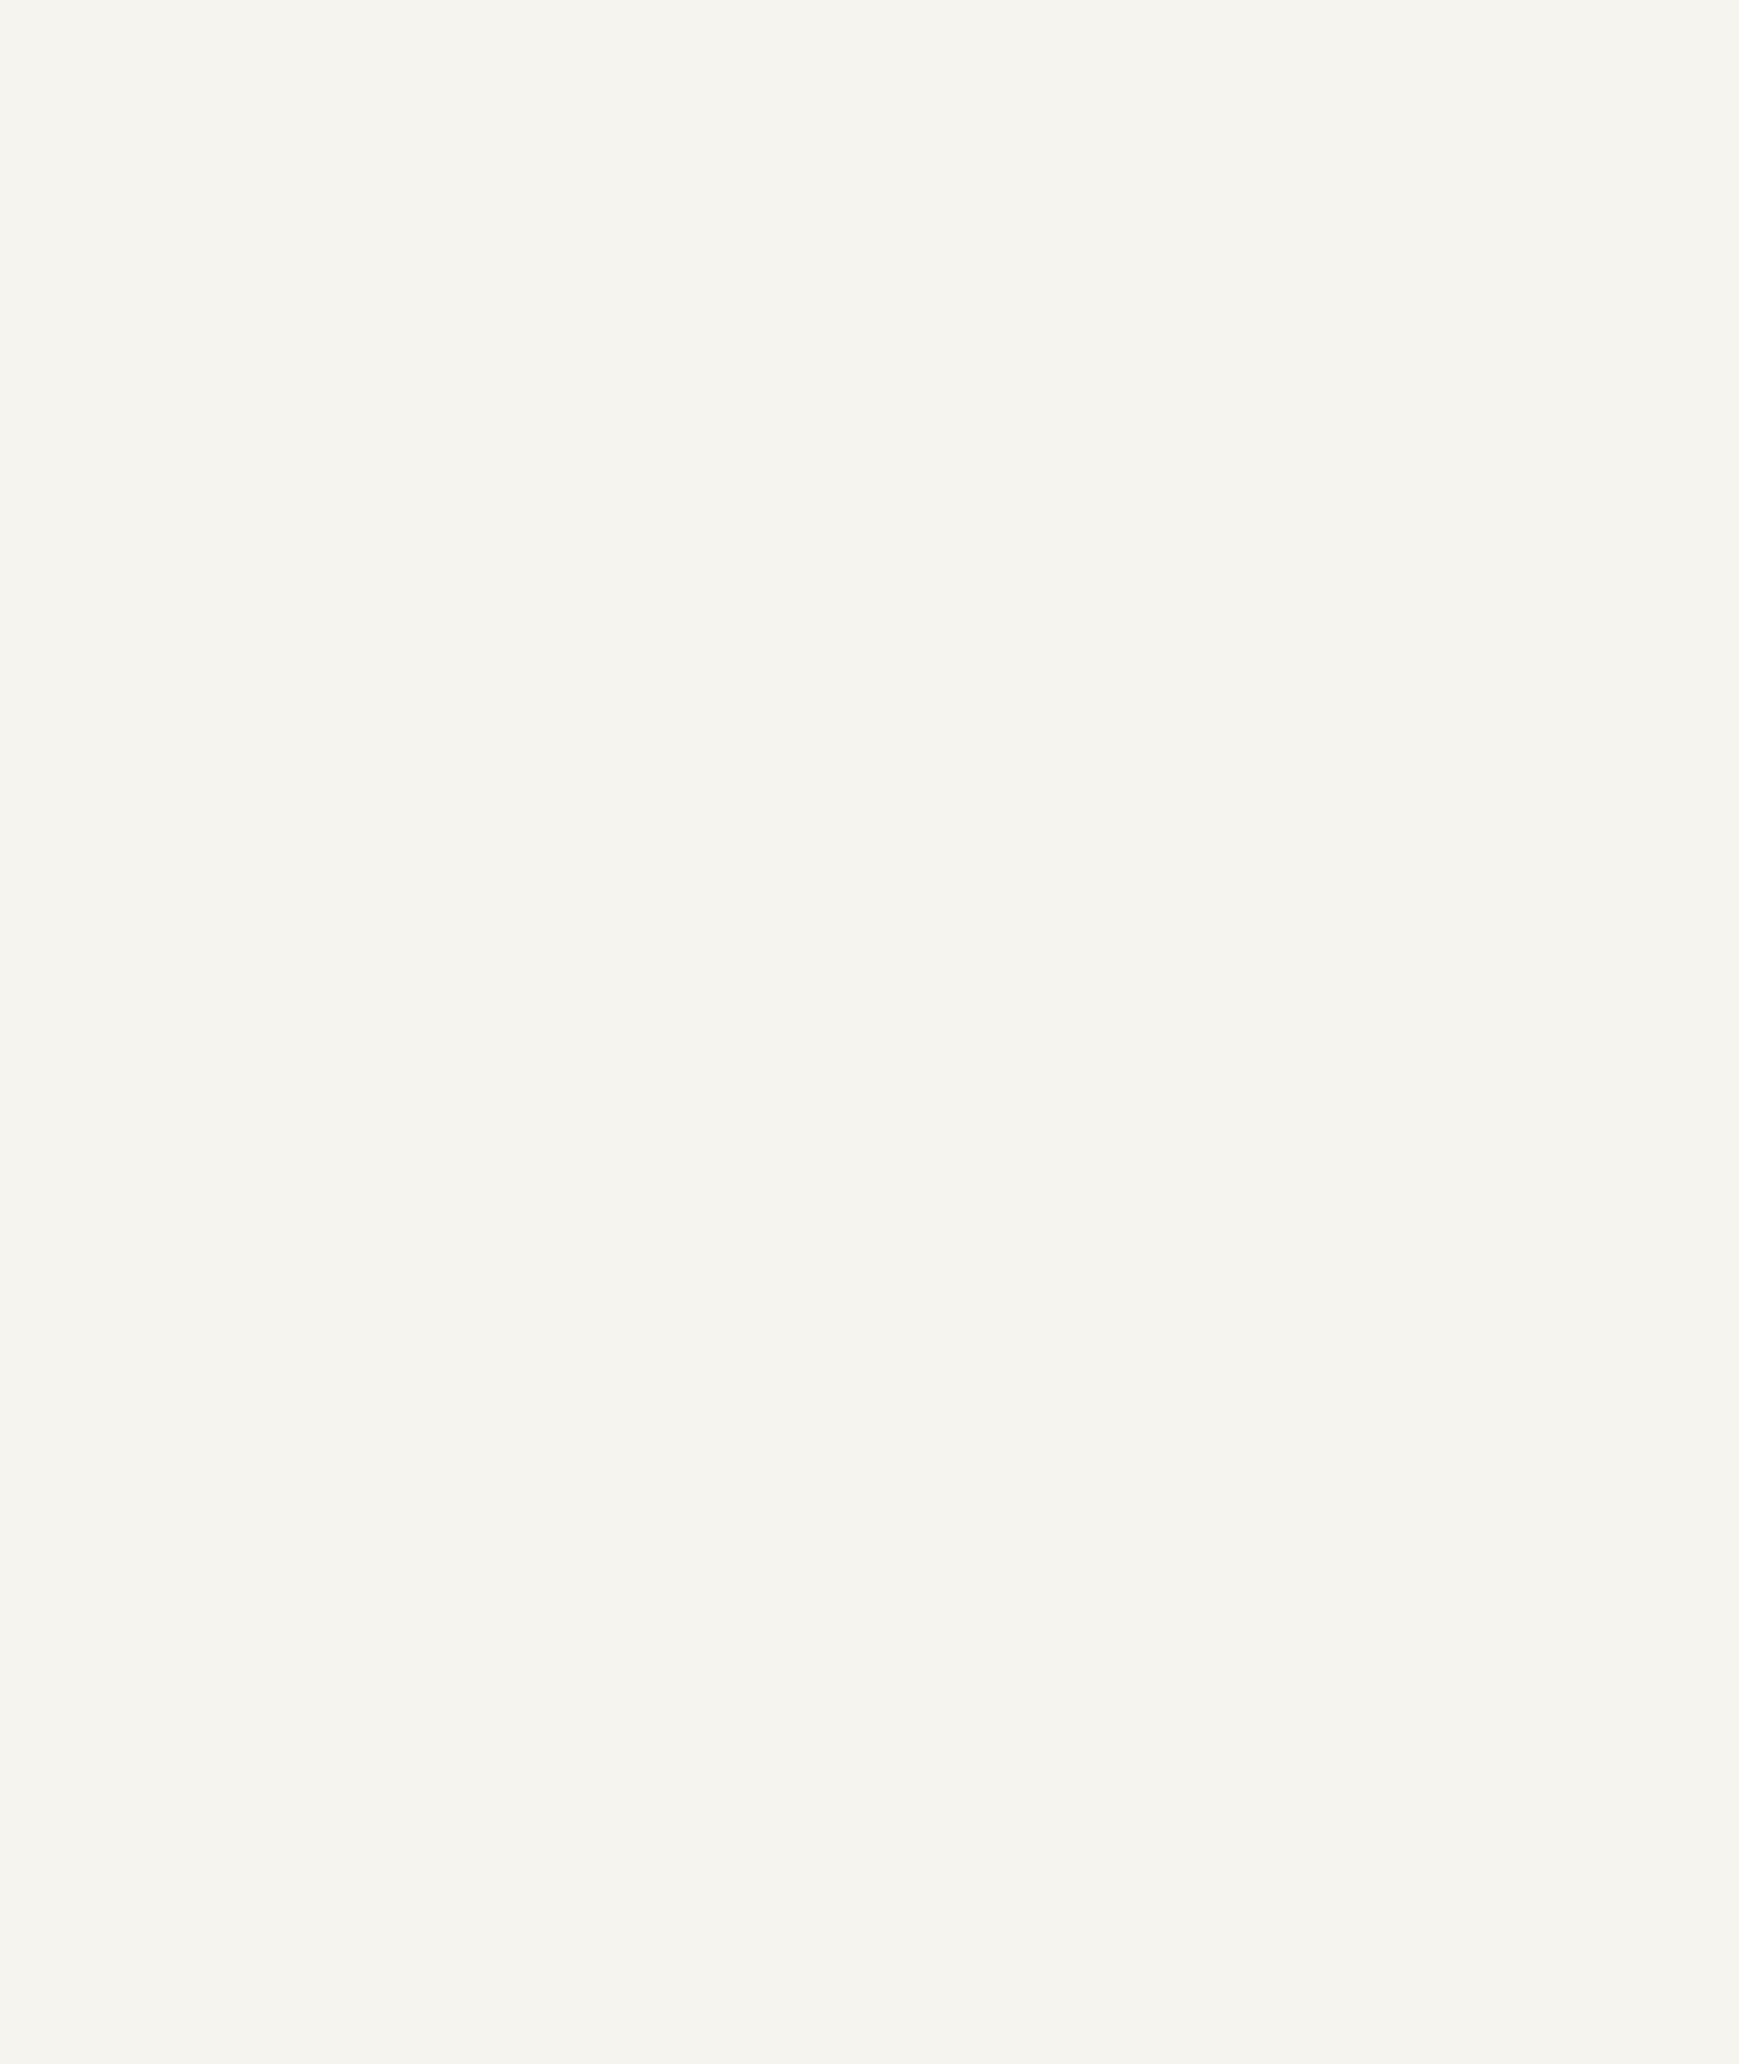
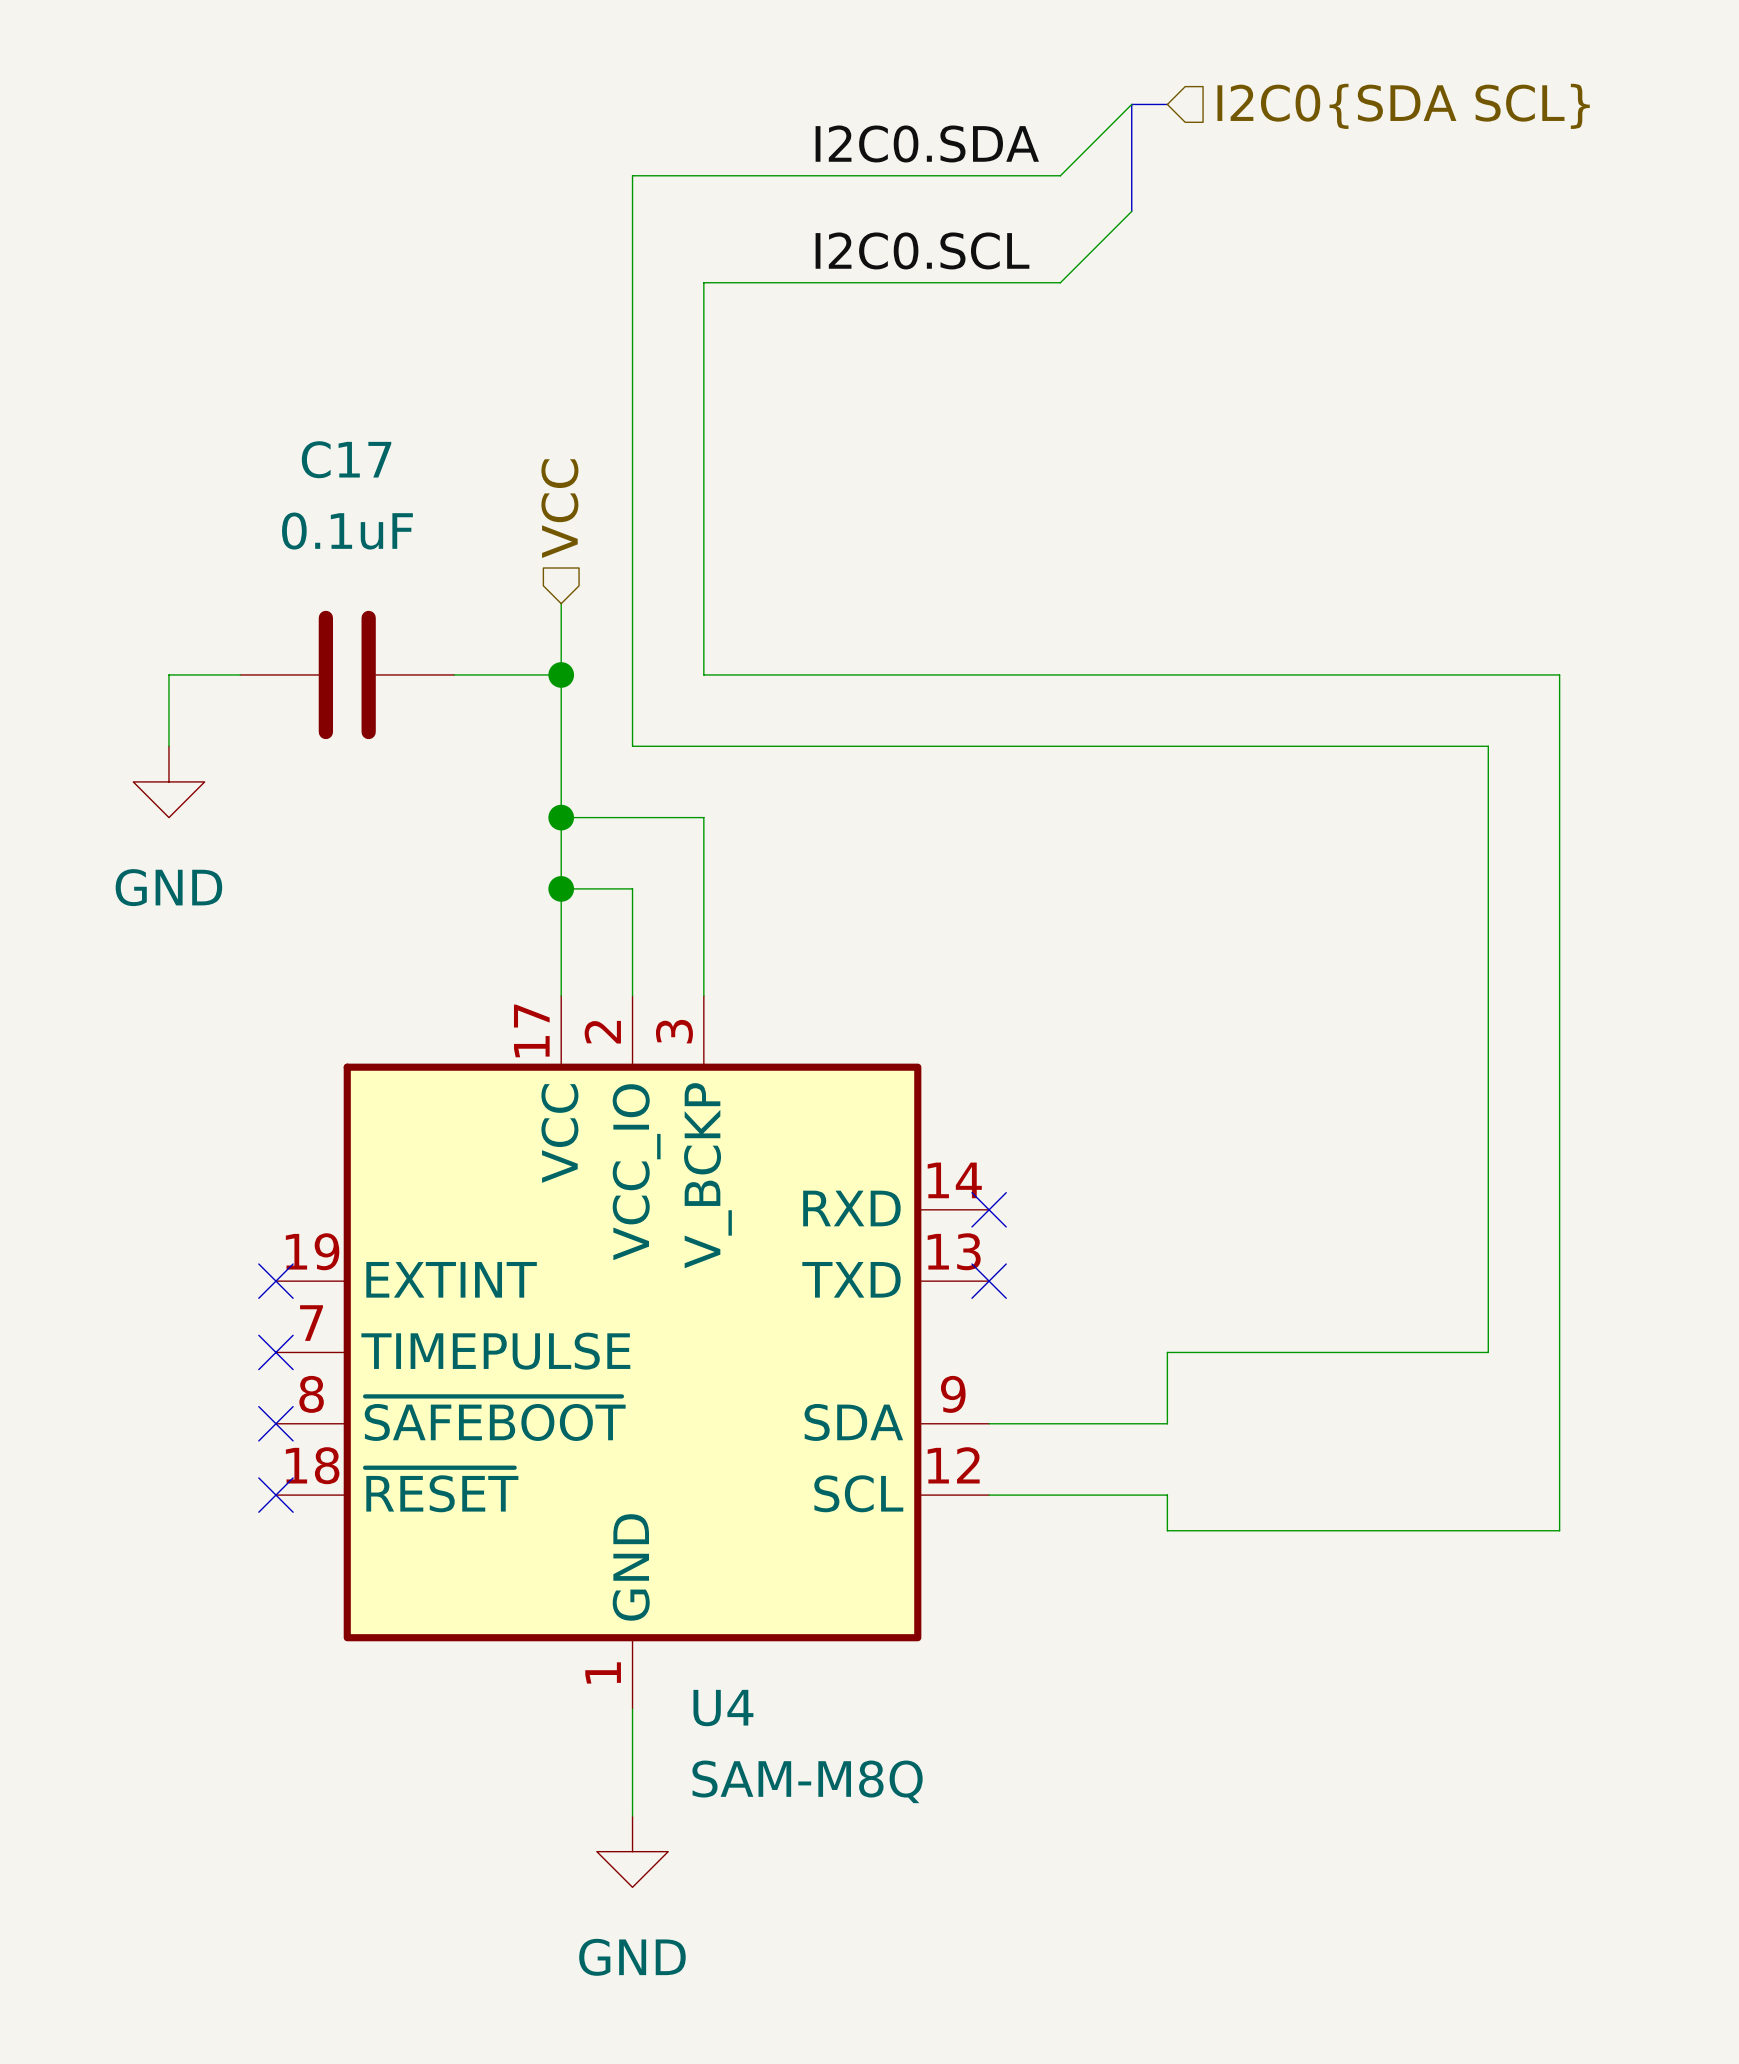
wire: none -> (1131, 104) (1060, 175) (632, 175) (632, 746) (1488, 746) (1488, 1352) (1167, 1352) (1167, 1423) (989, 1423)
bus: none -> (1167, 104) (1131, 104) (1131, 211)
hierarchical label: none -> I2C0{SDA SCL} (1403, 106)
label: none -> I2C0.SDA (927, 143)
wire: none -> (1131, 211) (1060, 282) (703, 282) (703, 674) (1559, 674) (1559, 1530) (1167, 1530) (1167, 1495) (989, 1495)
label: none -> I2C0.SCL (922, 250)
hierarchical label: none -> VCC (559, 508)
wire: none -> (561, 603) (561, 995)
wire: none -> (240, 674) (168, 674) (168, 746)
C17: none -> 0.1uF (347, 674)
wire: none -> (454, 674) (561, 674)
junction: none -> (561, 674)
power symbol: none -> GND (168, 781)
wire: none -> (561, 817) (703, 817) (703, 995)
junction: none -> (561, 817)
wire: none -> (561, 888) (632, 888) (632, 995)
junction: none -> (561, 888)
no-connect mark: none -> (989, 1209)
no-connect mark: none -> (275, 1281)
no-connect mark: none -> (989, 1281)
no-connect mark: none -> (275, 1352)
U4: none -> SAM-M8Q (632, 1352)
no-connect mark: none -> (275, 1423)
no-connect mark: none -> (275, 1495)
wire: none -> (632, 1709) (632, 1816)
power symbol: none -> GND (632, 1851)

